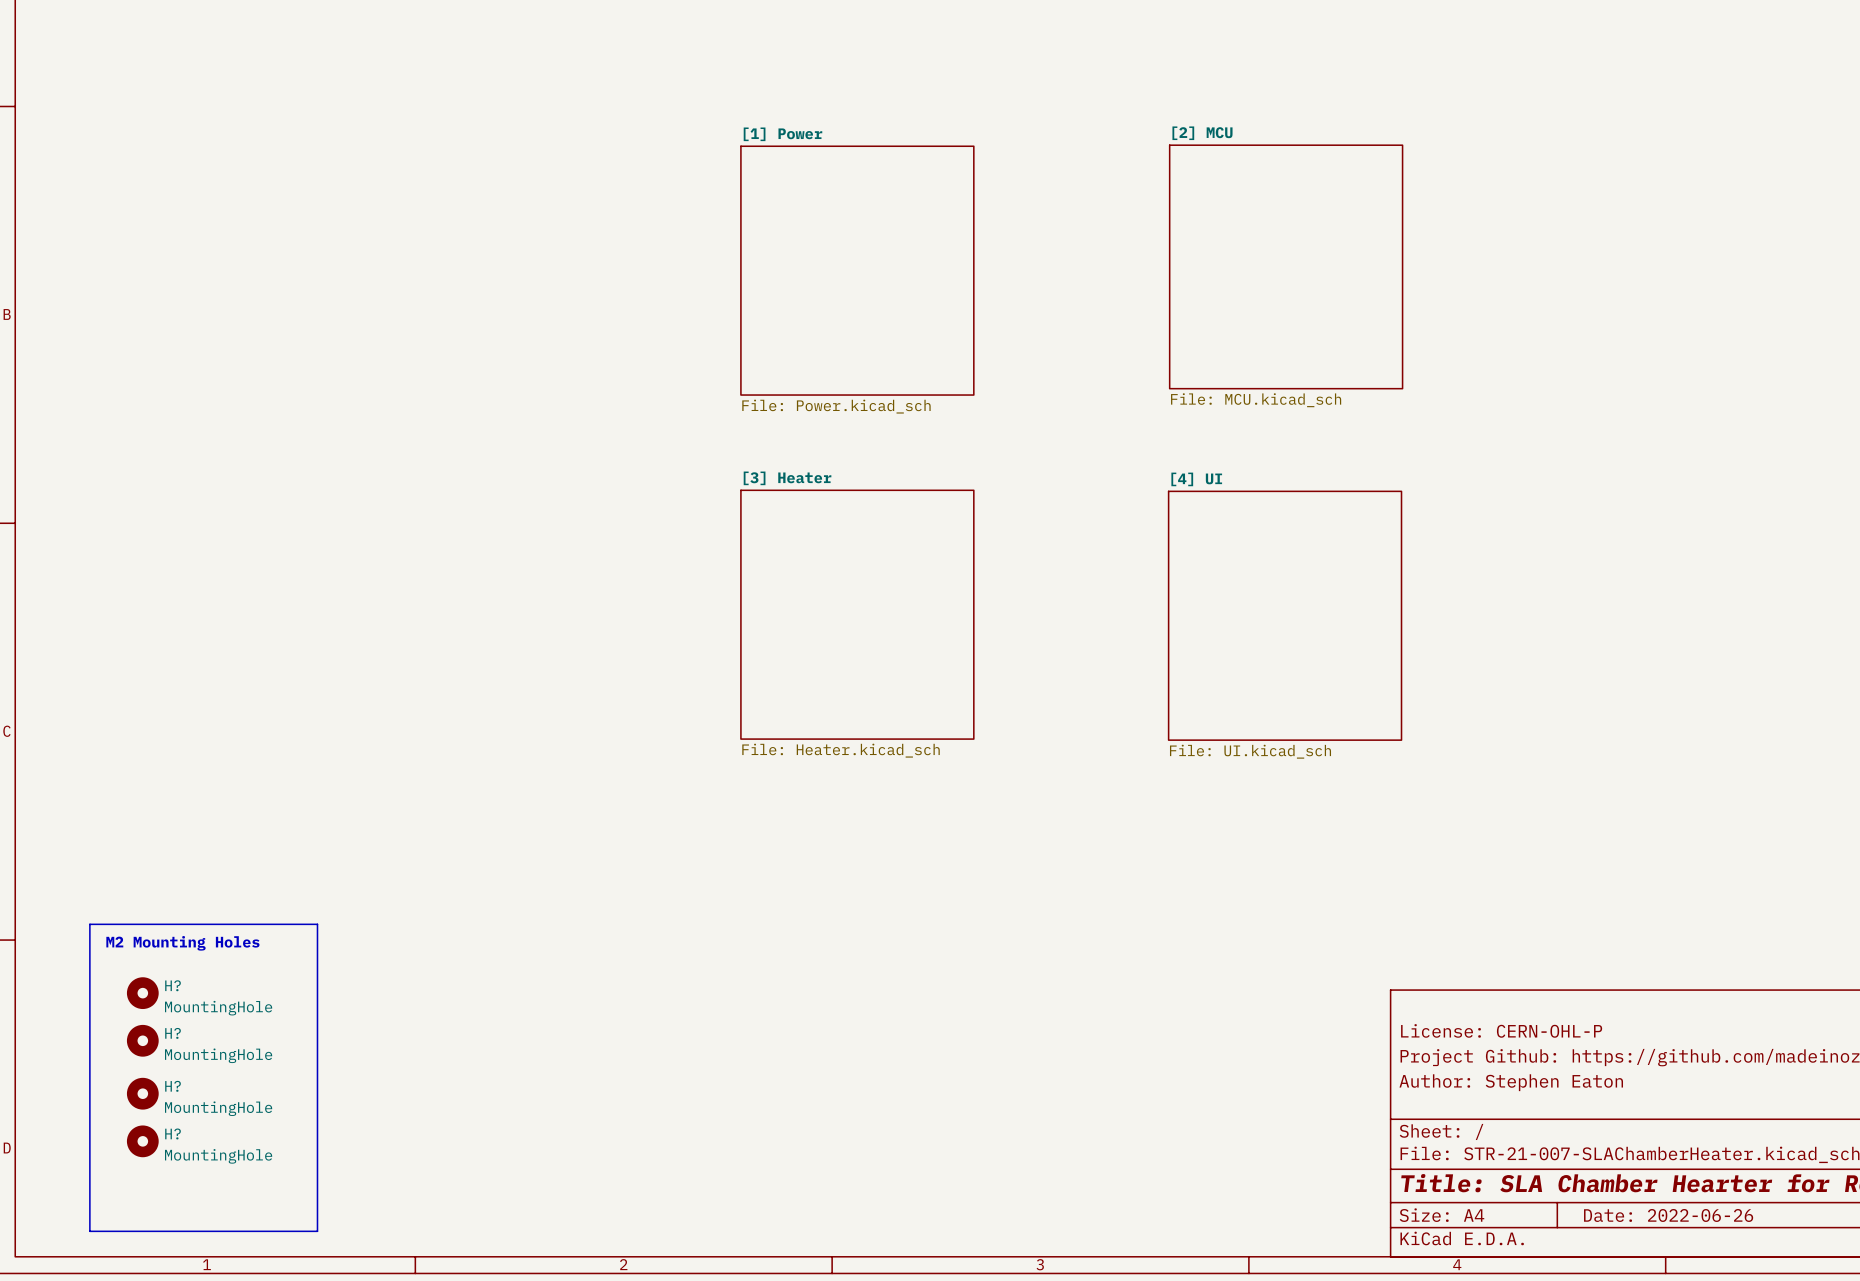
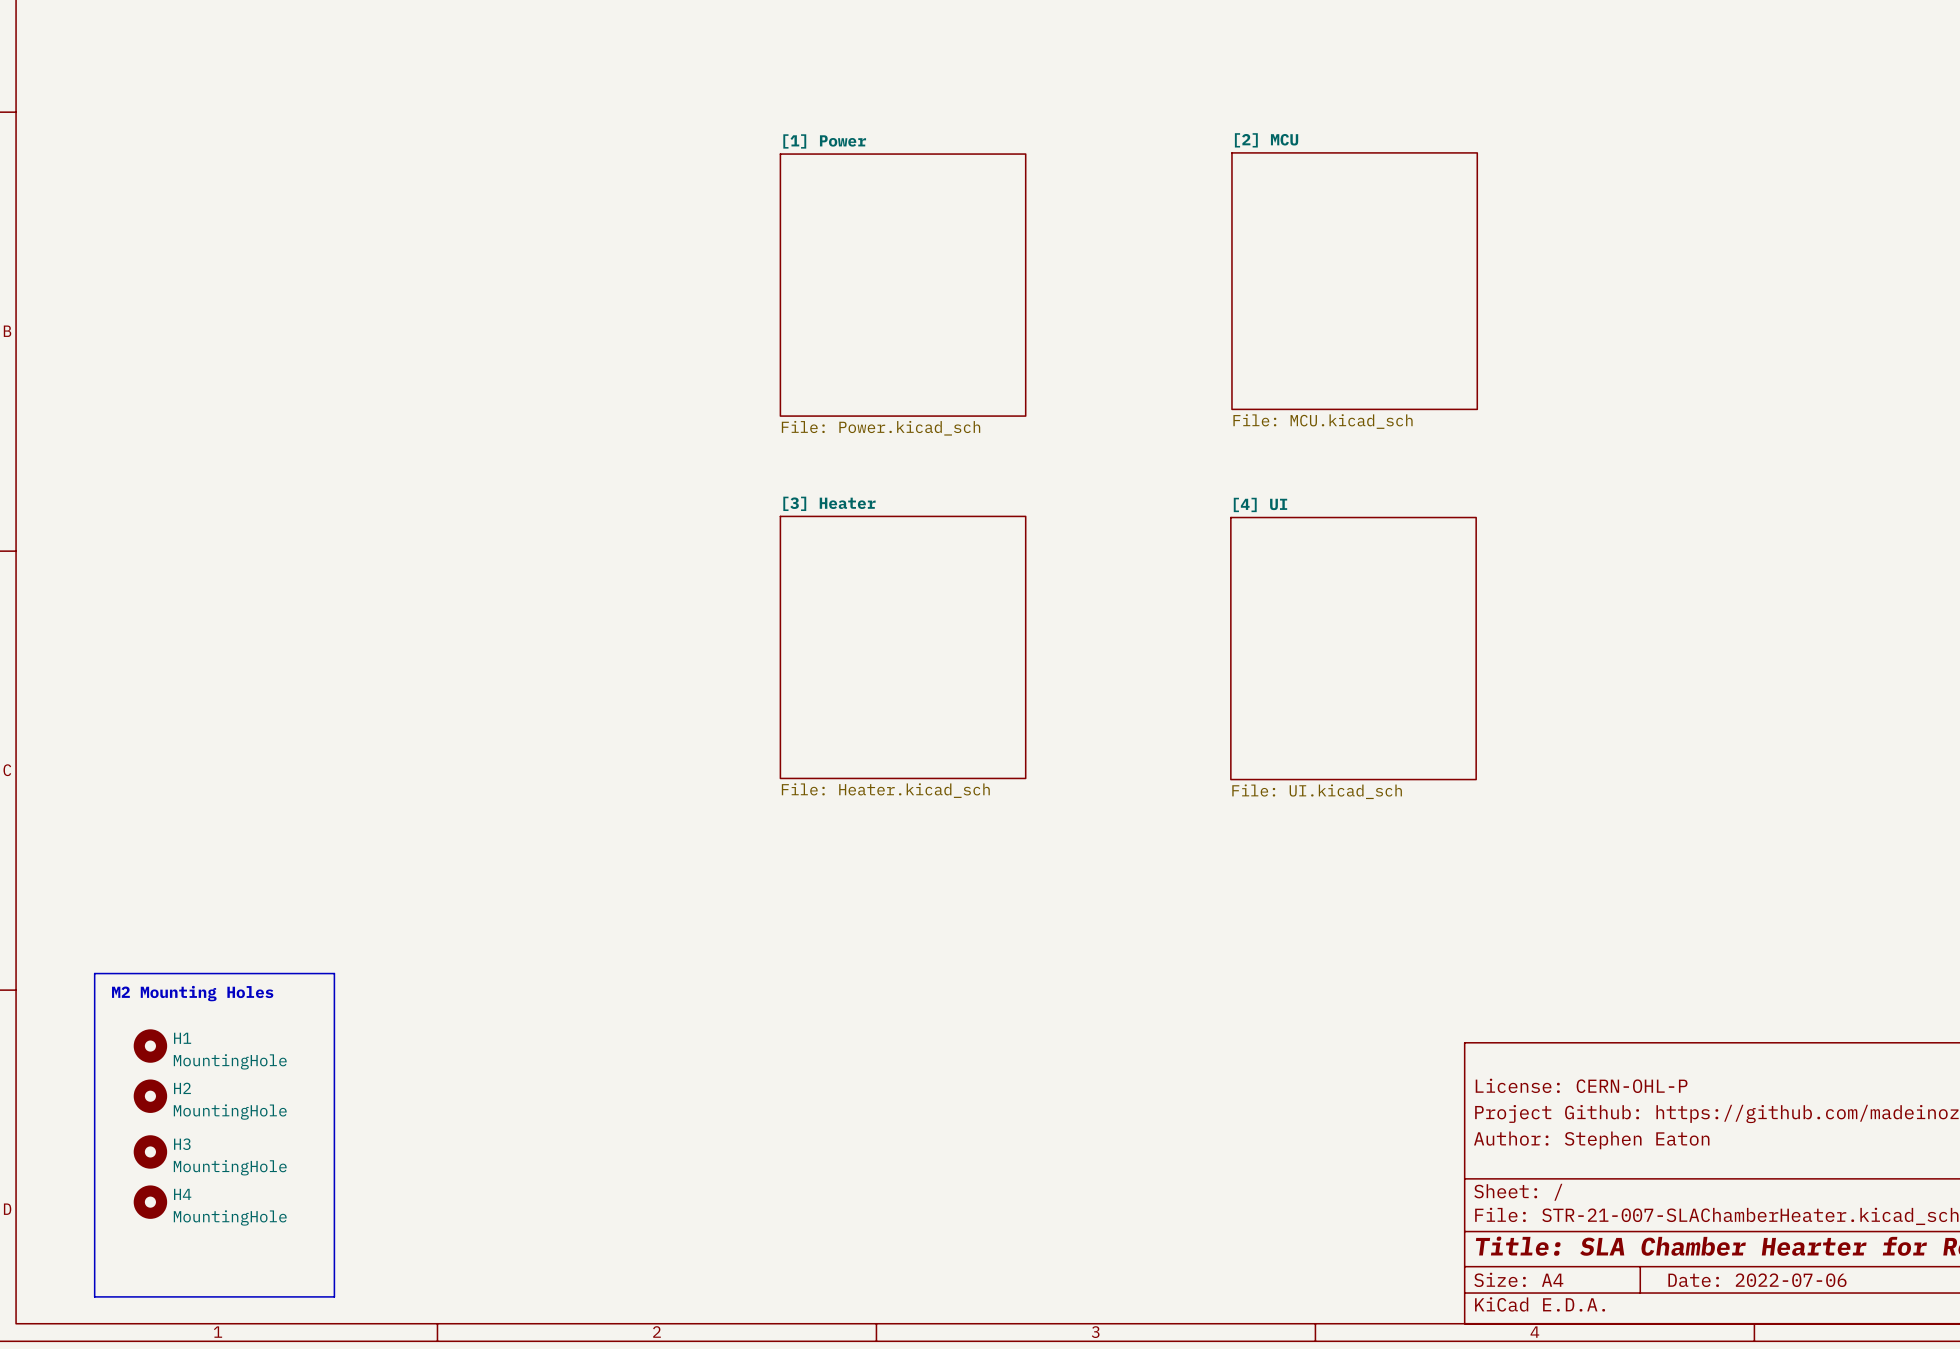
H? name: H? (173, 985) -> H1 (182, 1038)
H? name: H? (173, 1033) -> H2 (182, 1088)
H? name: H? (173, 1086) -> H3 (182, 1144)
H? name: H? (173, 1133) -> H4 (182, 1194)
title block: Date: 2022-06-26 (1668, 1215) -> Date: 2022-07-06 (1757, 1280)

